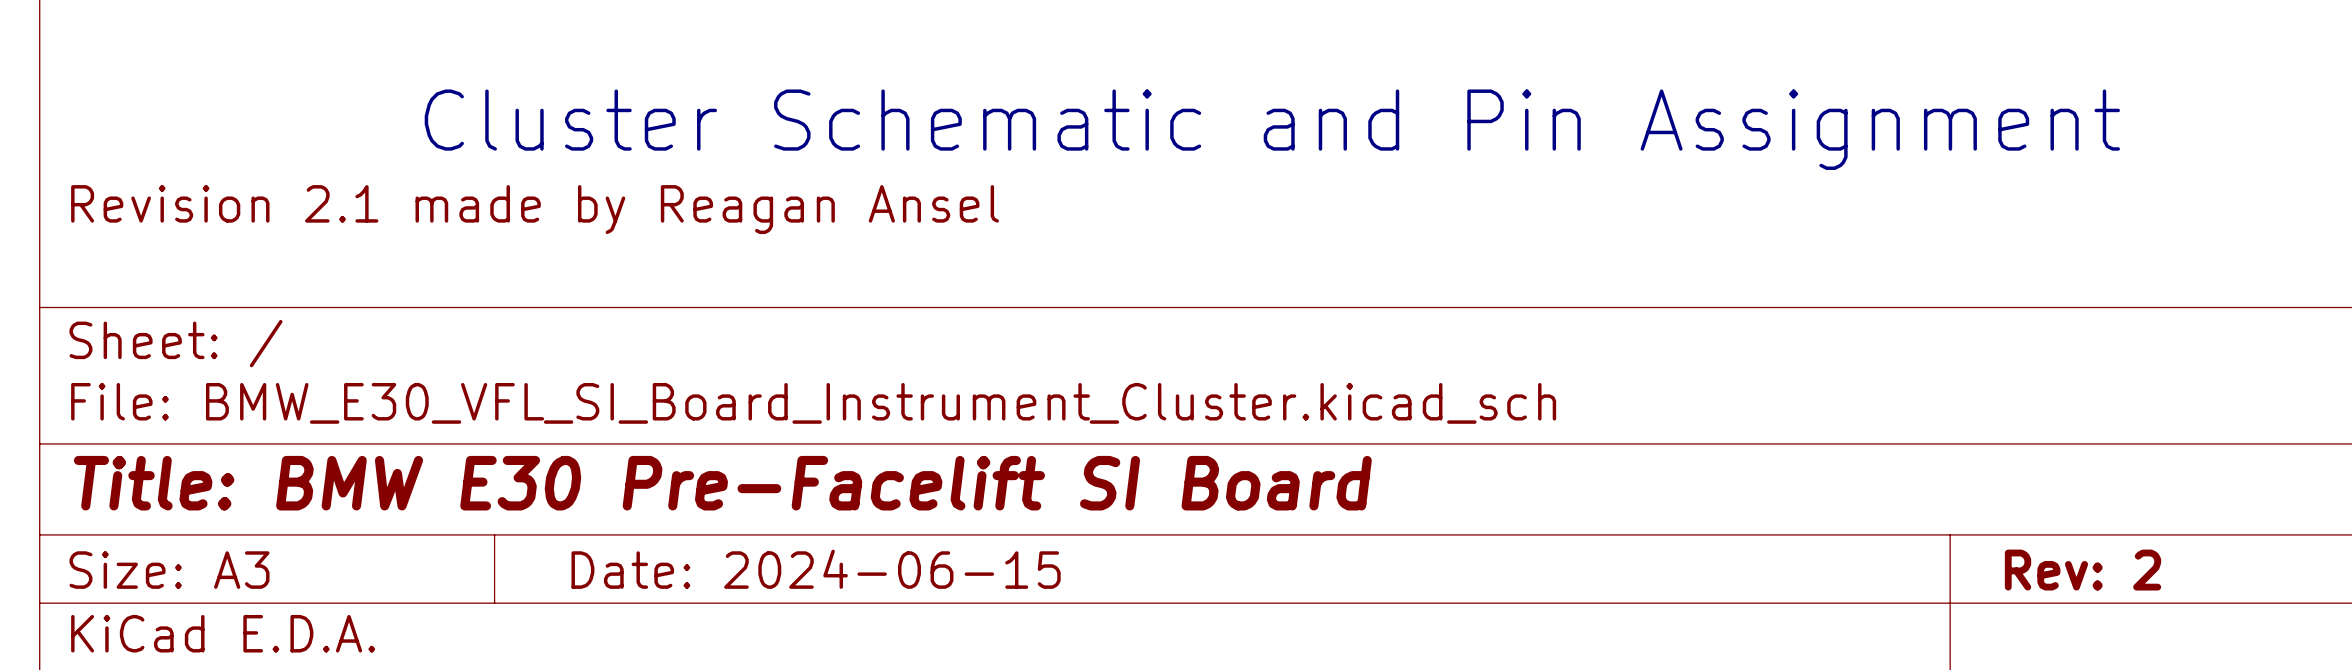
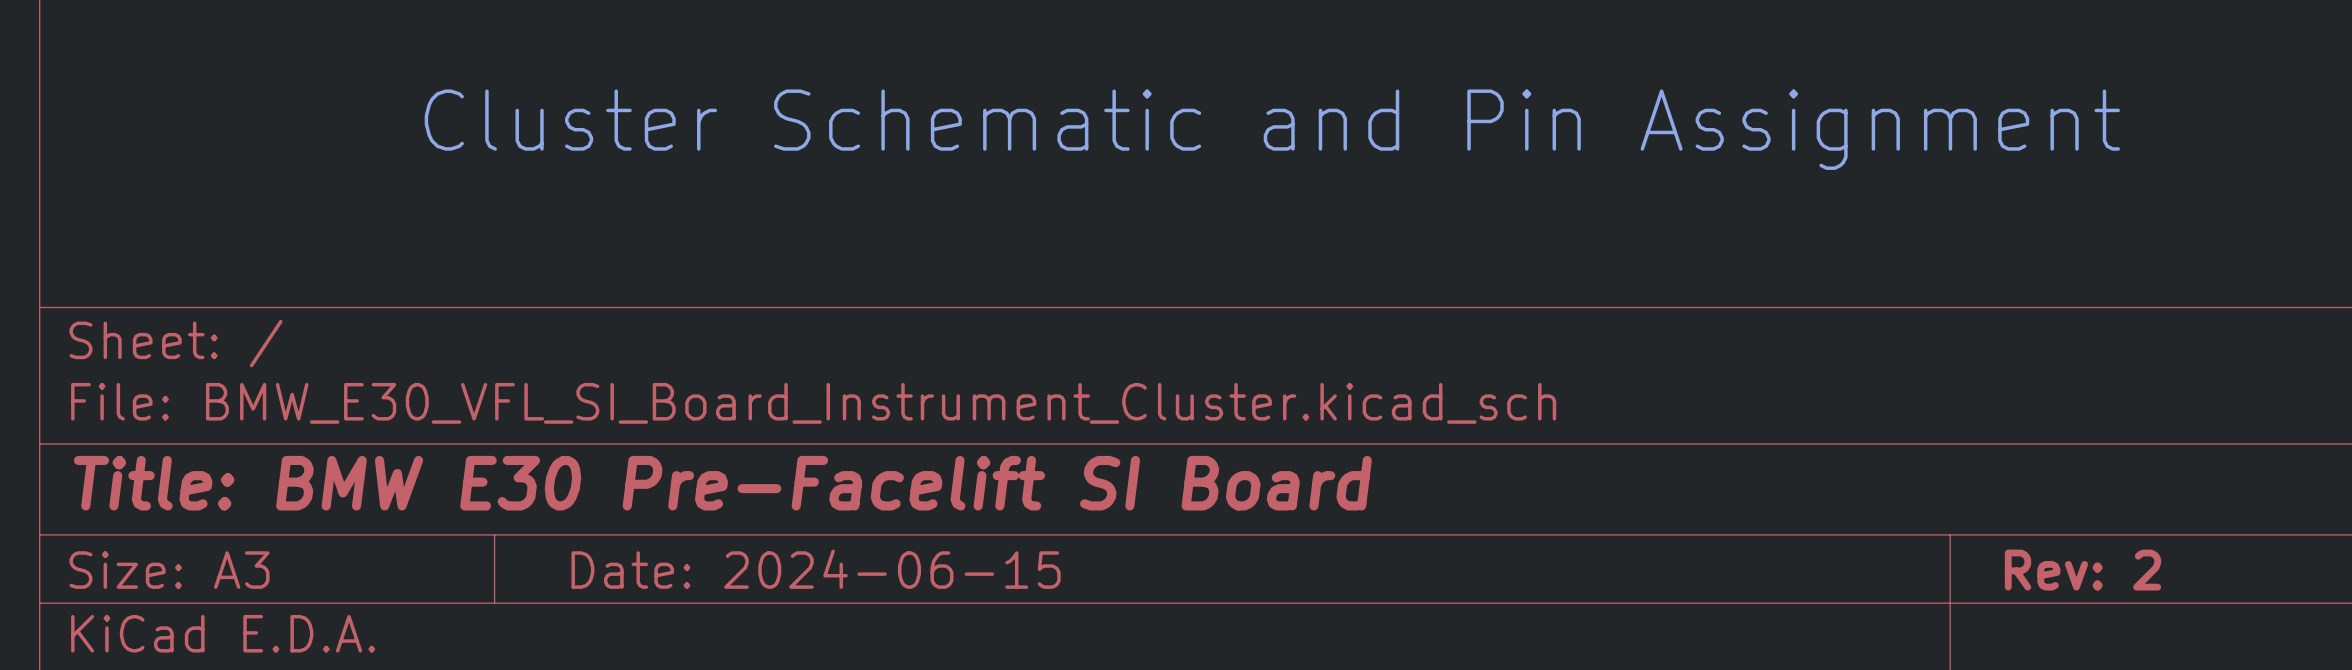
title block: Revision 2.1 made by Reagan Ansel (535, 209) -> none

